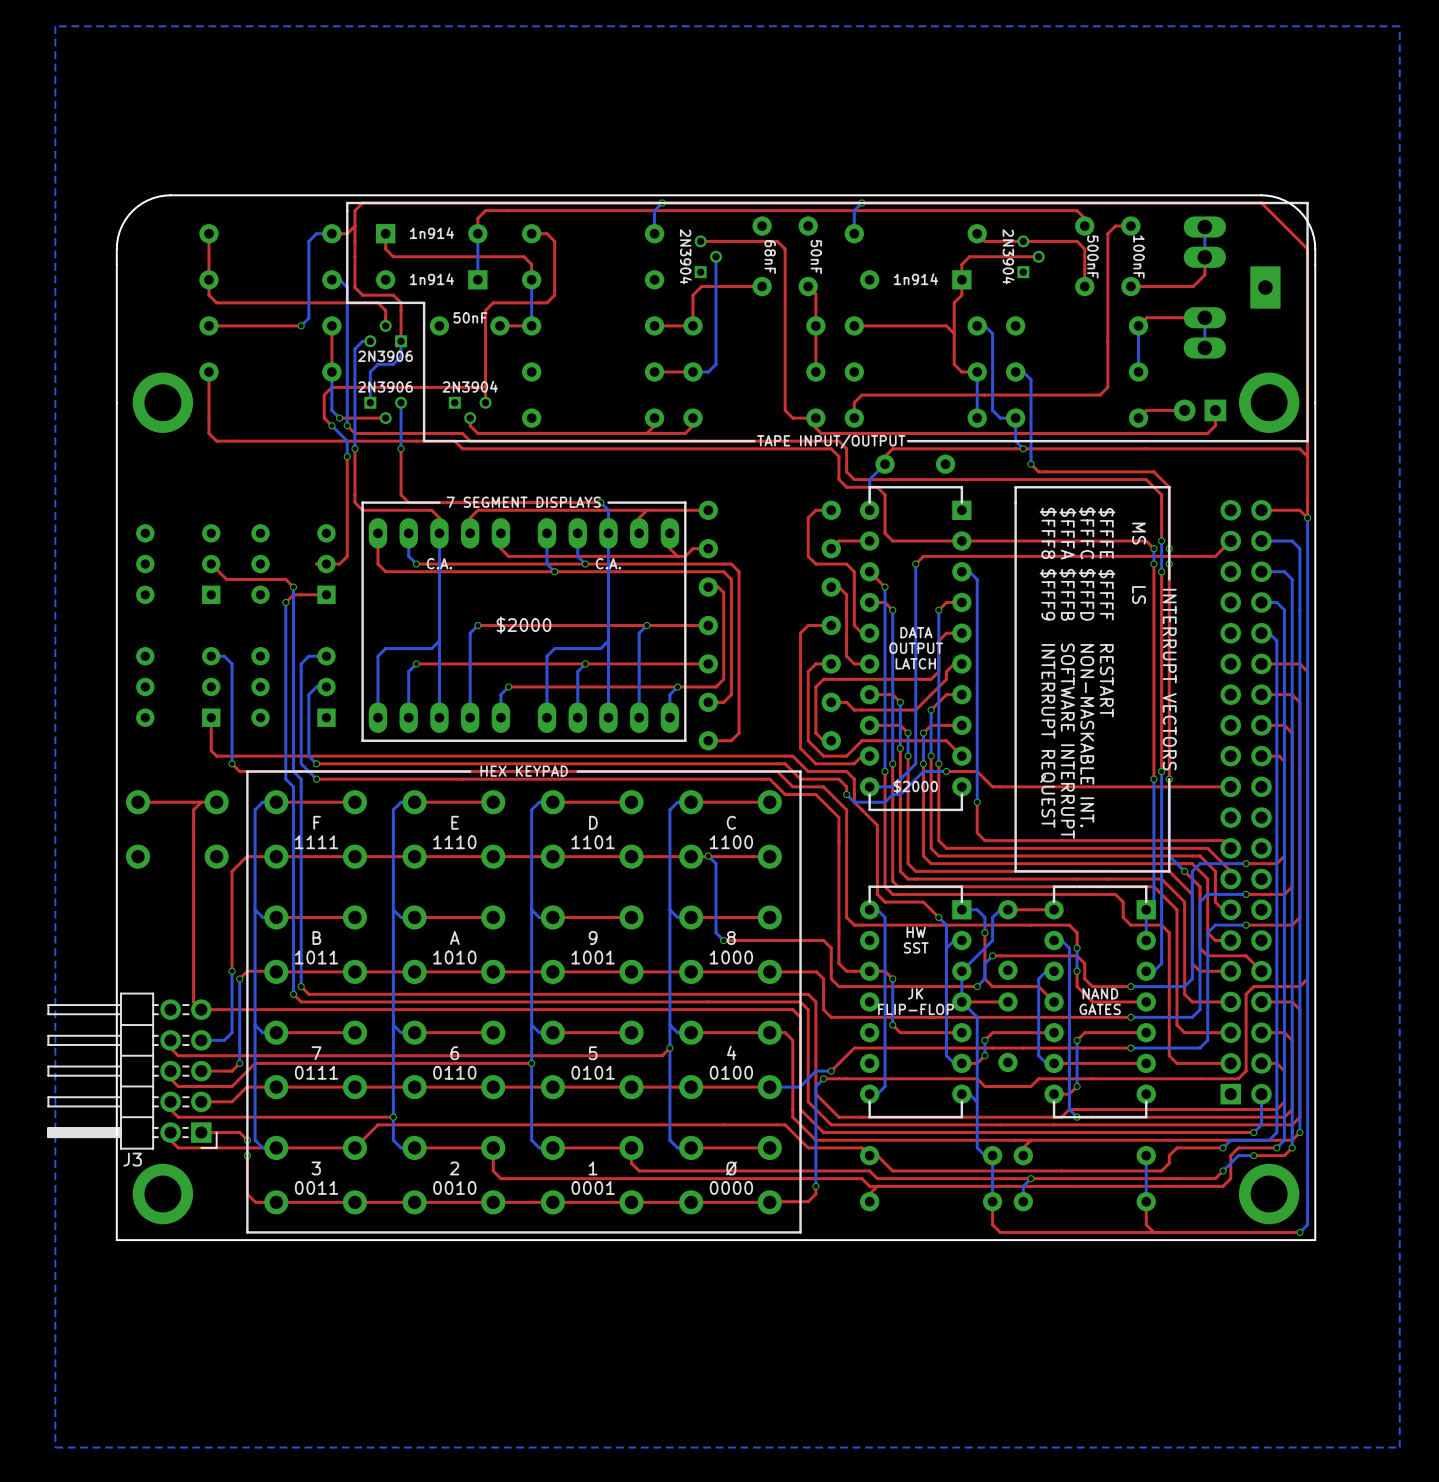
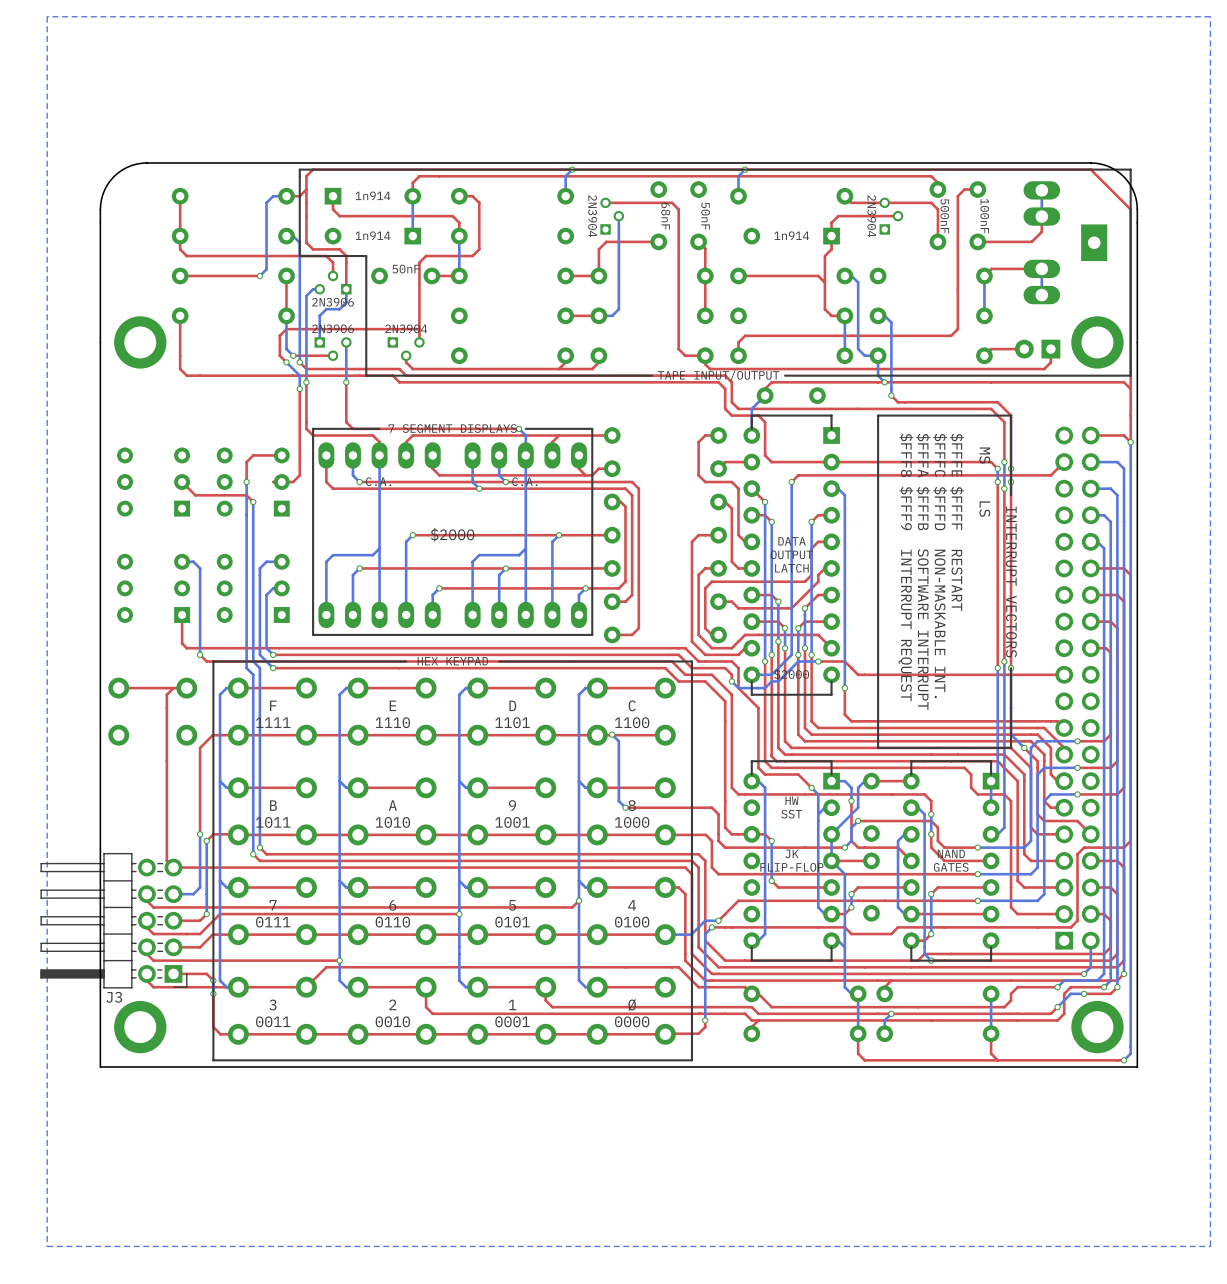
top track: none -> (281, 455) (253, 455) (246, 462) (246, 482)
bottom track: none -> (246, 482) (246, 515)
top track: (326, 594) (293, 594) (285, 602) -> none
via position: (285, 602) -> (246, 482)

